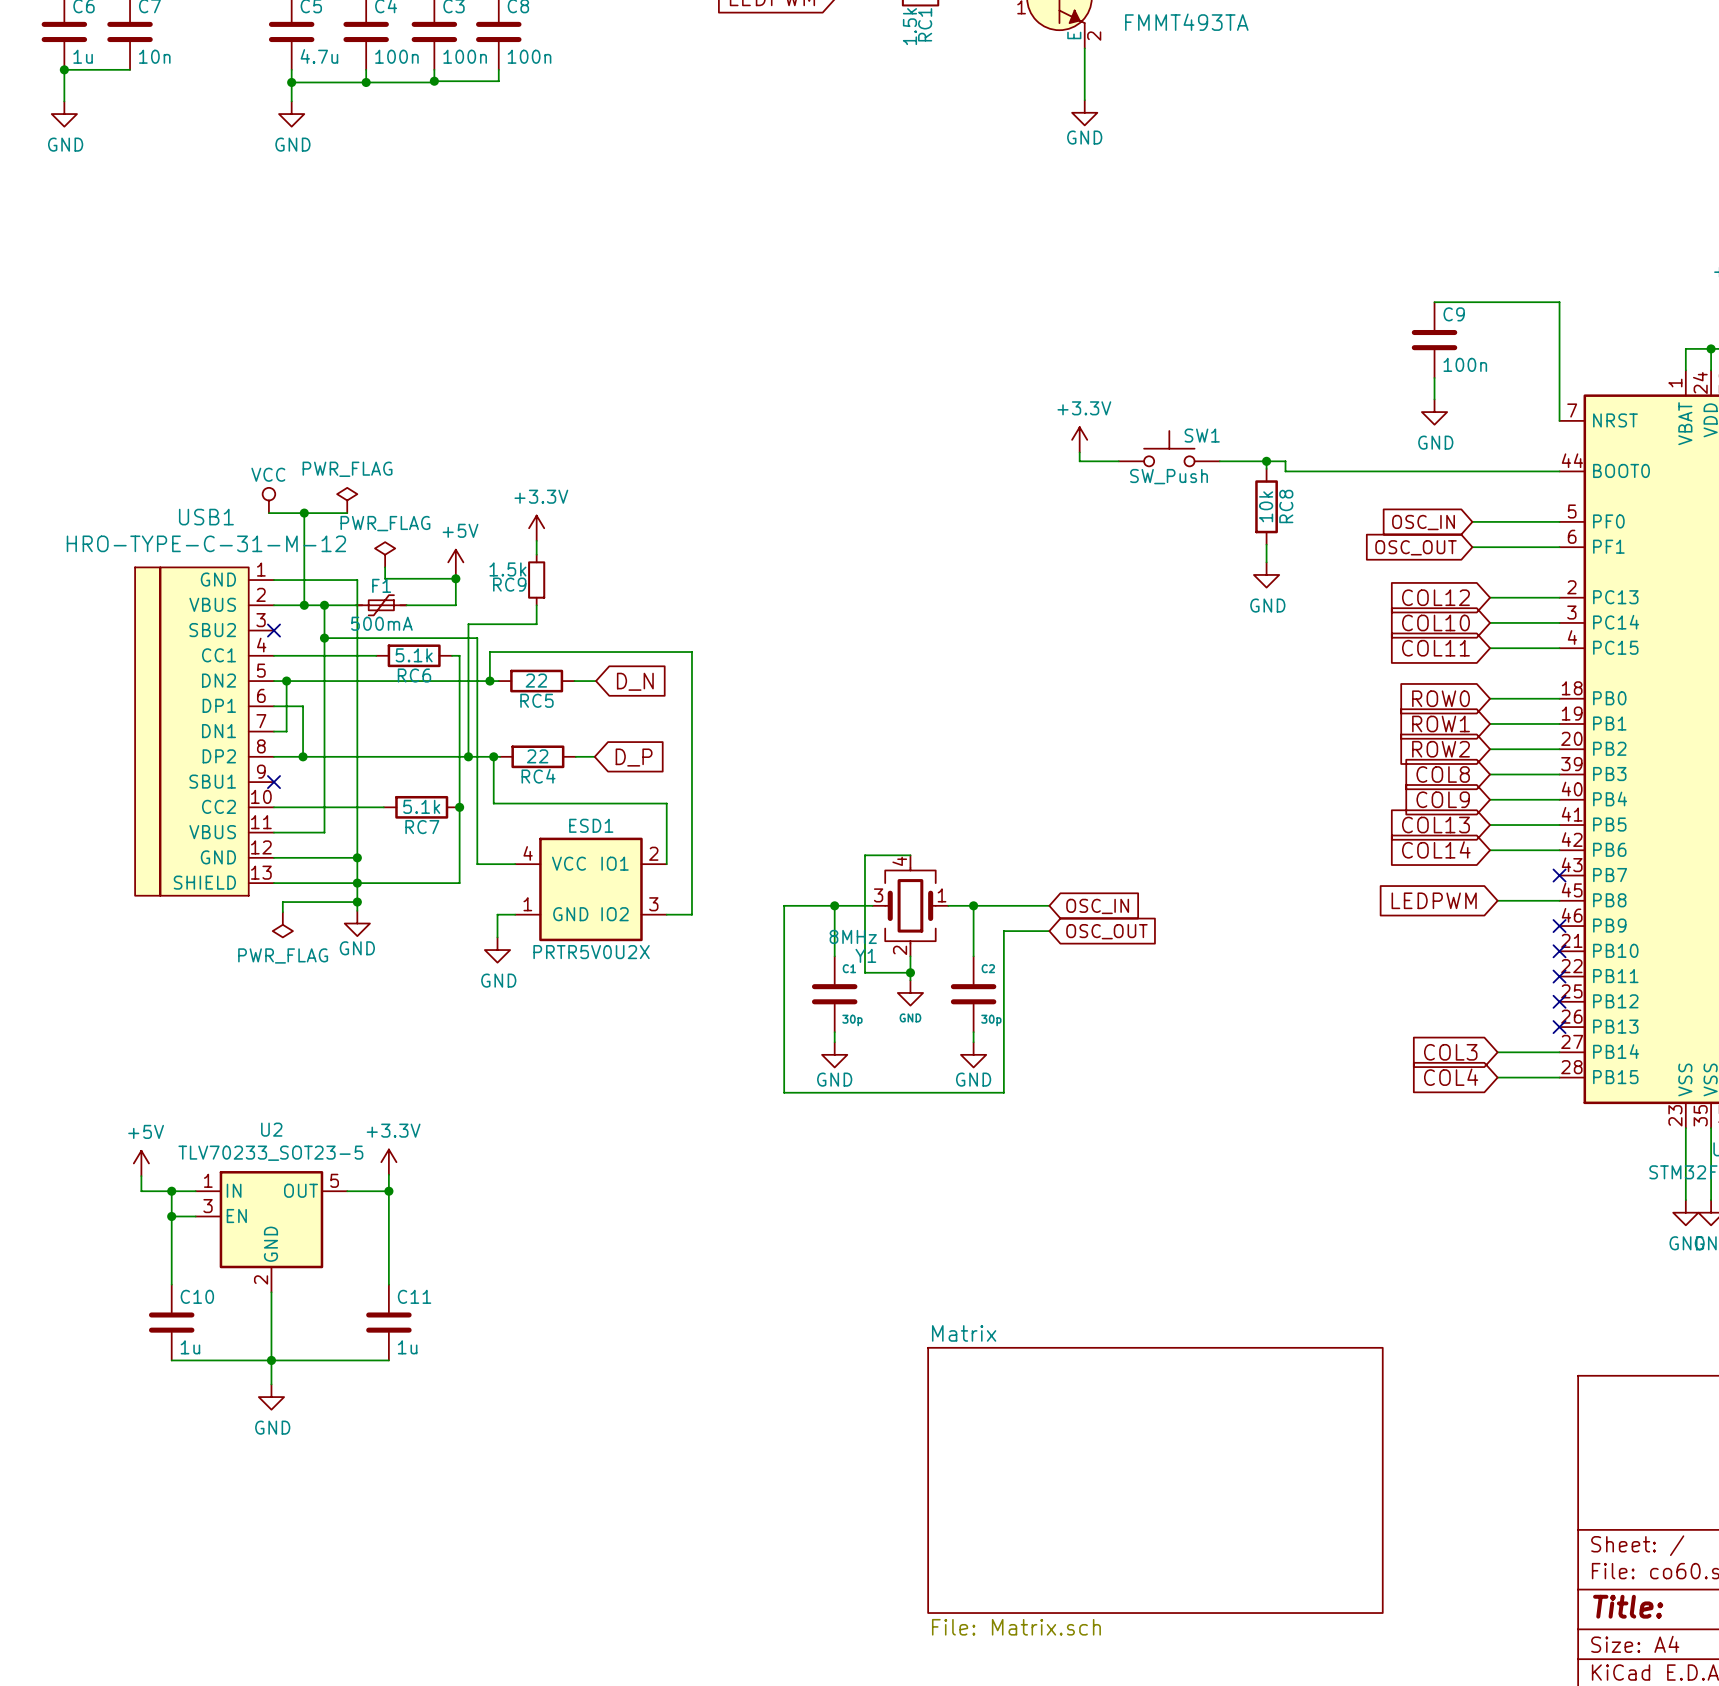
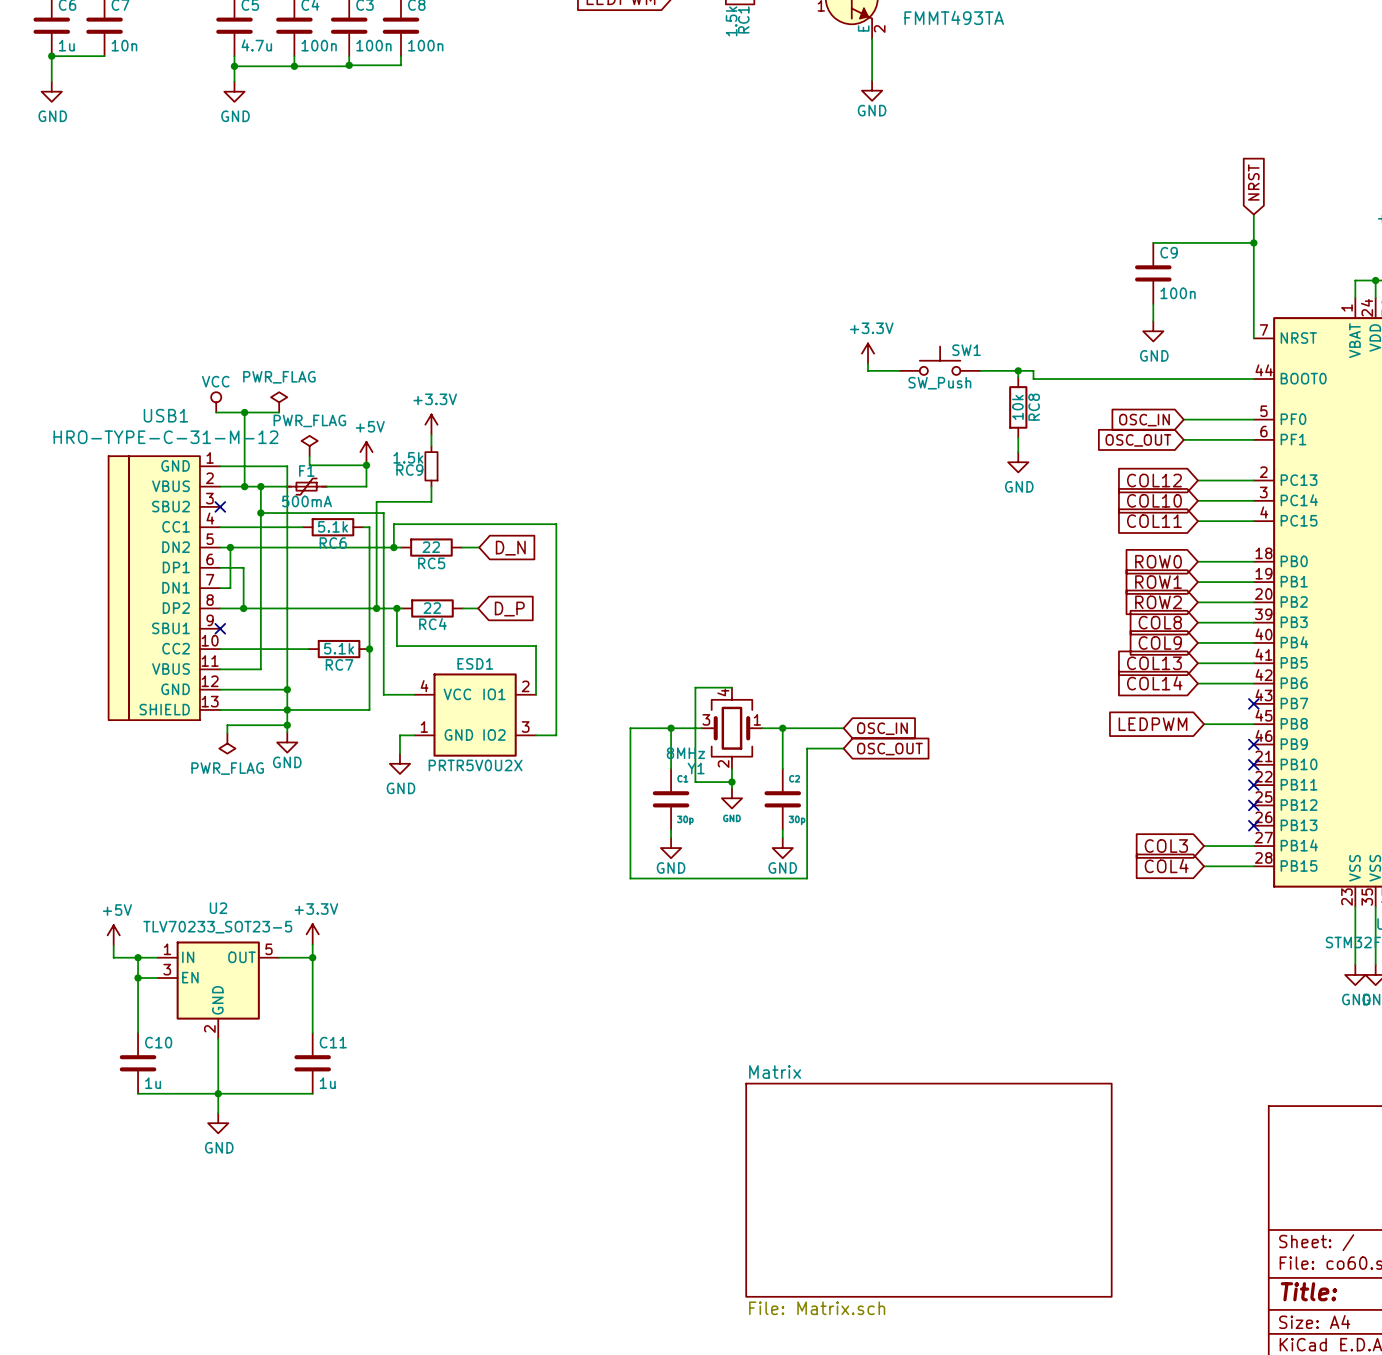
global label: none -> NRST (1253, 182)
wire: none -> (1253, 214) (1253, 242)
junction: none -> (1253, 242)

